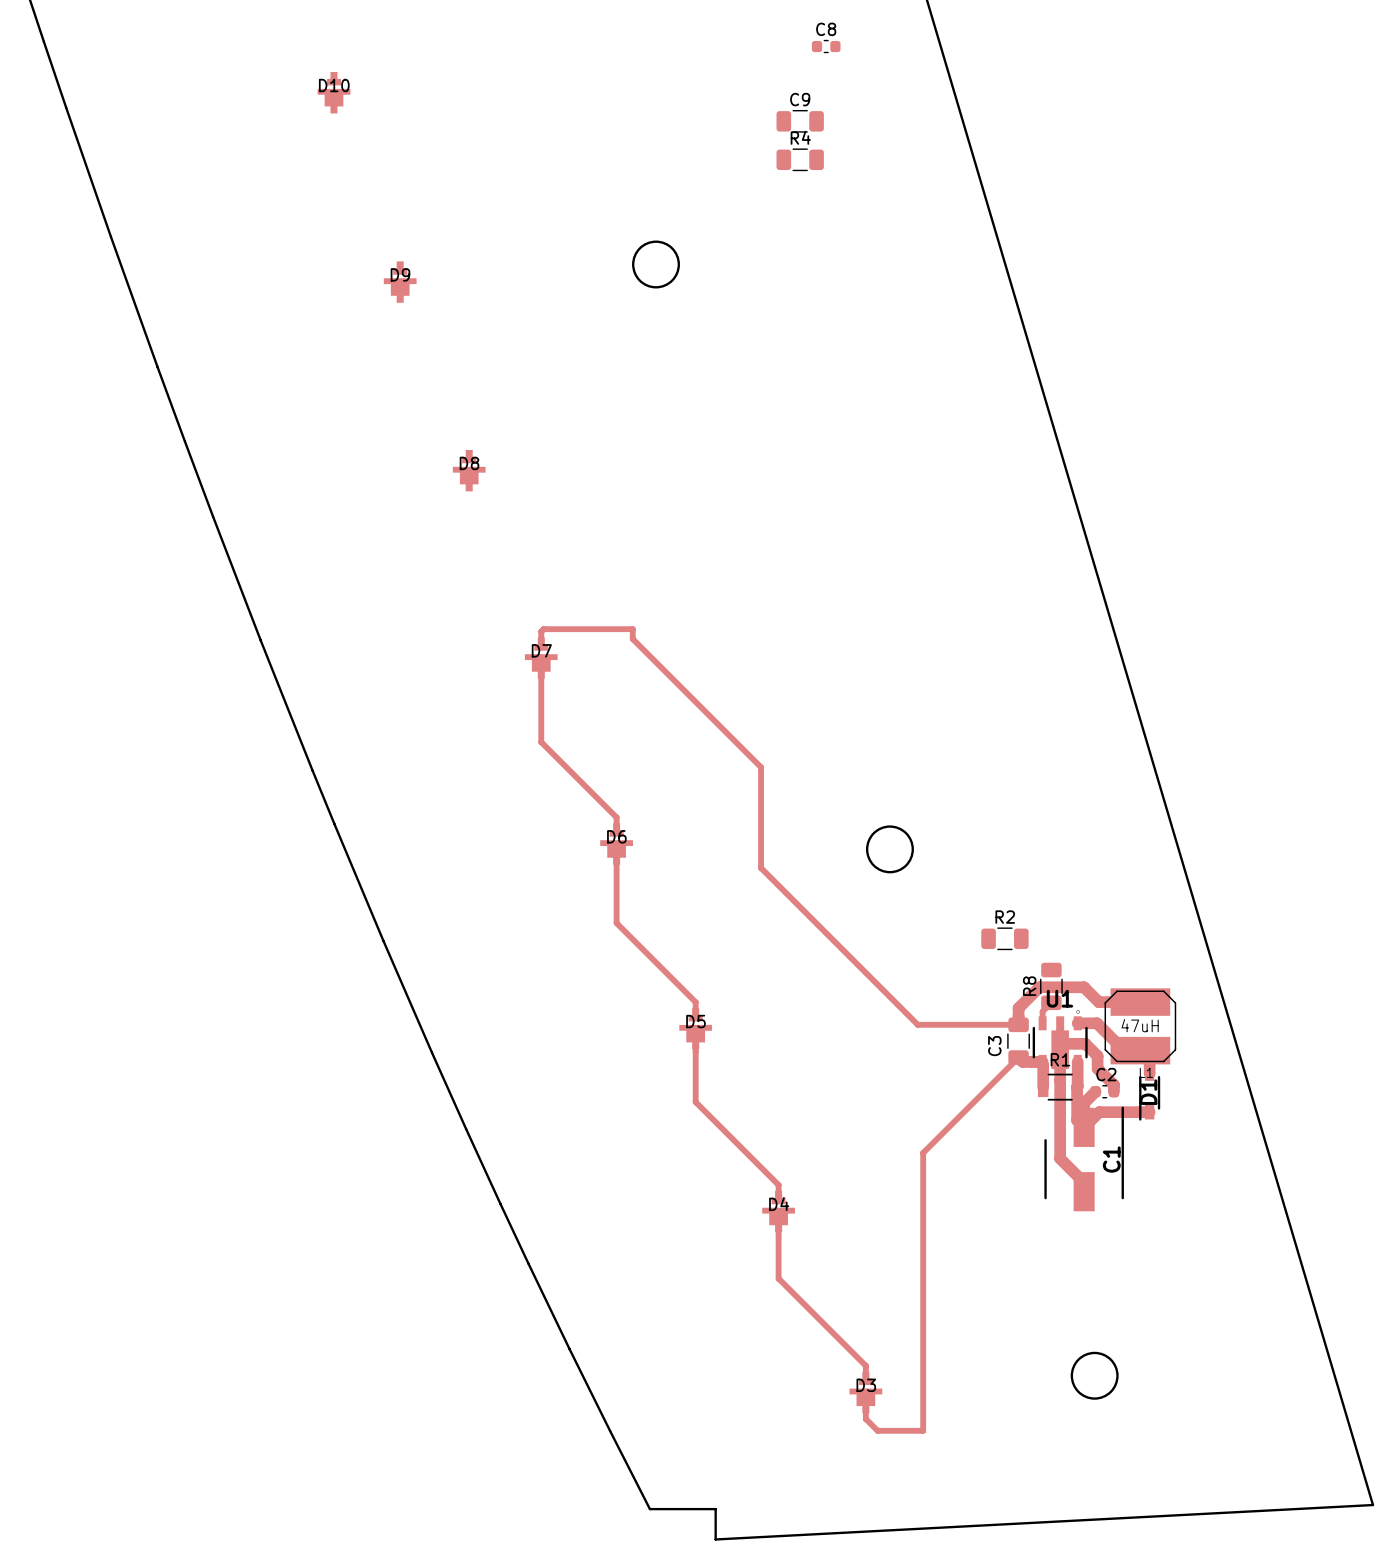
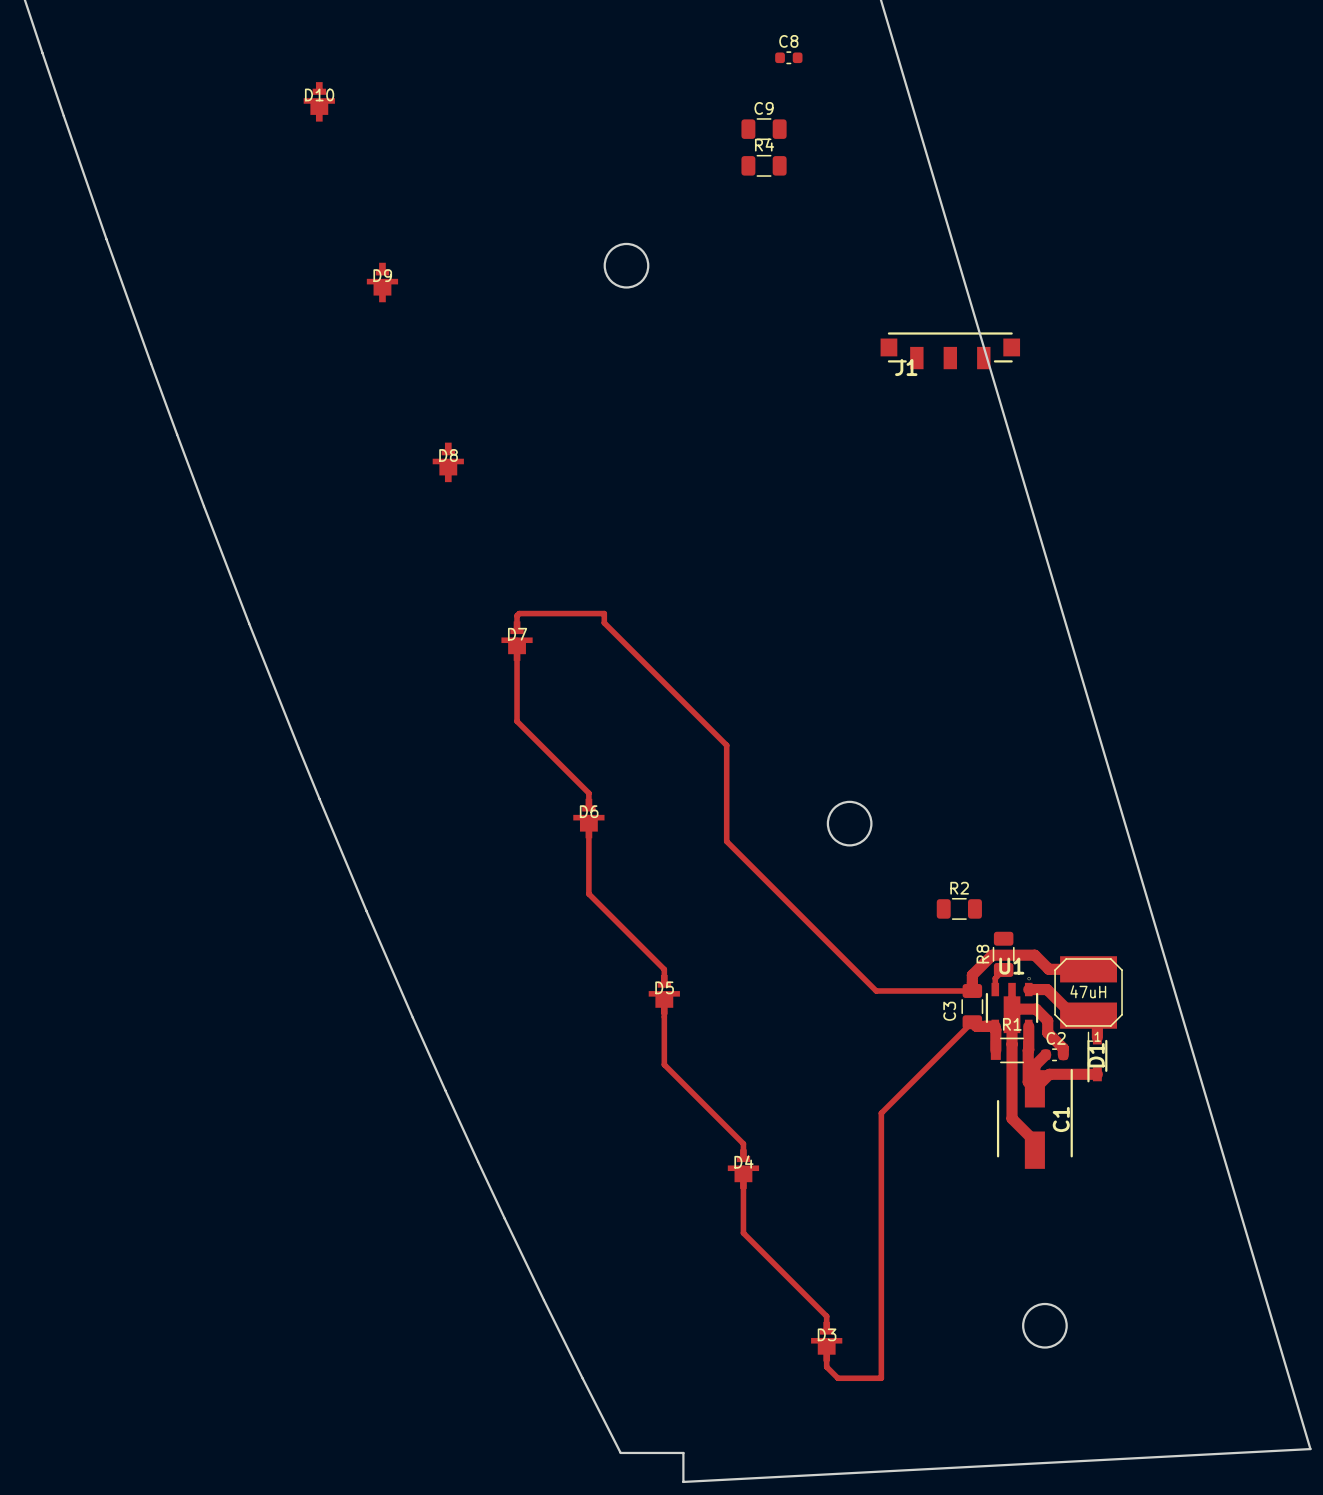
J1: none -> (950, 350)

